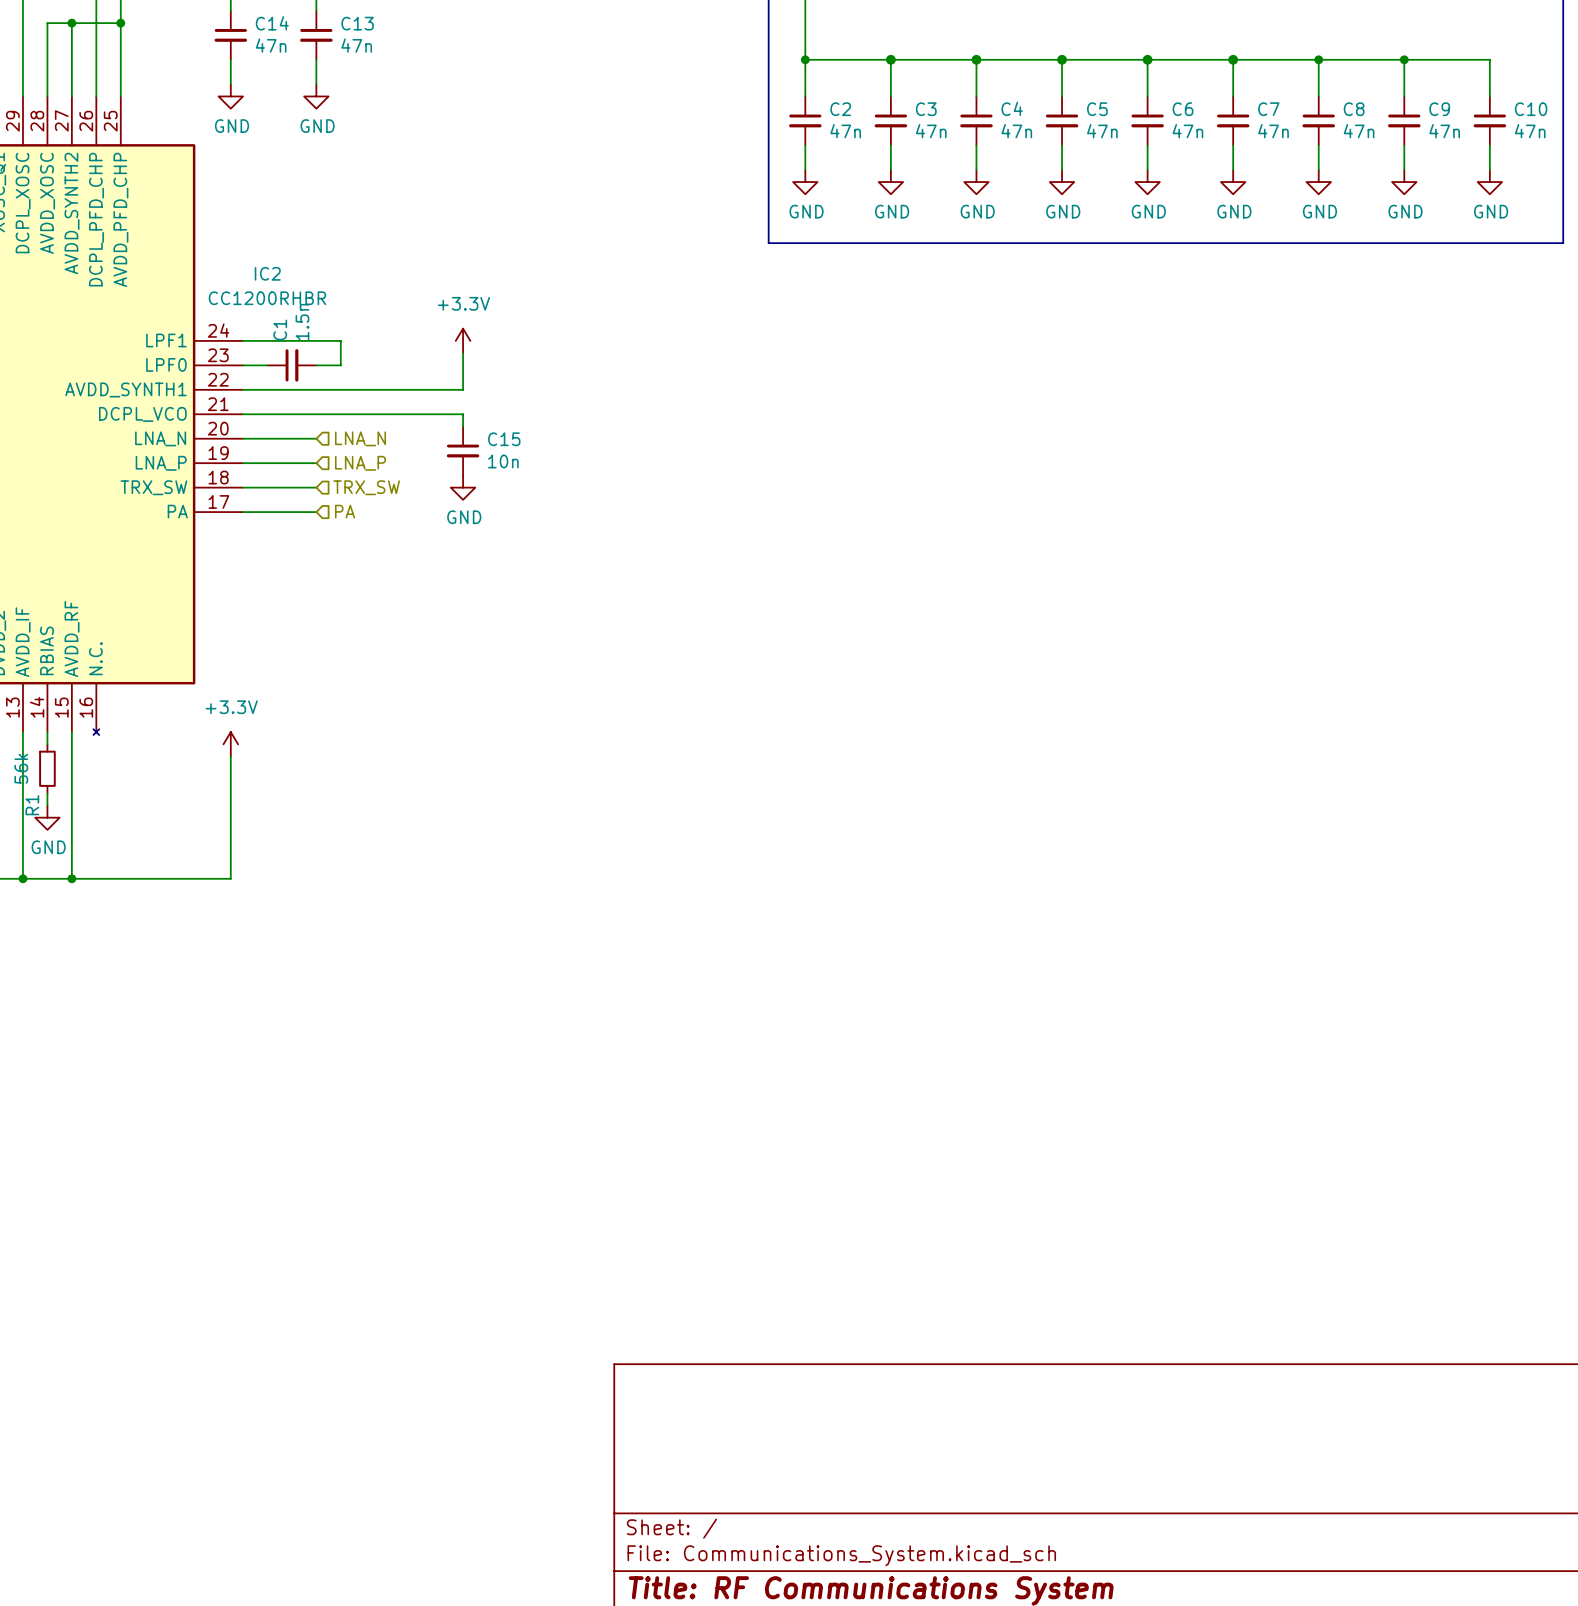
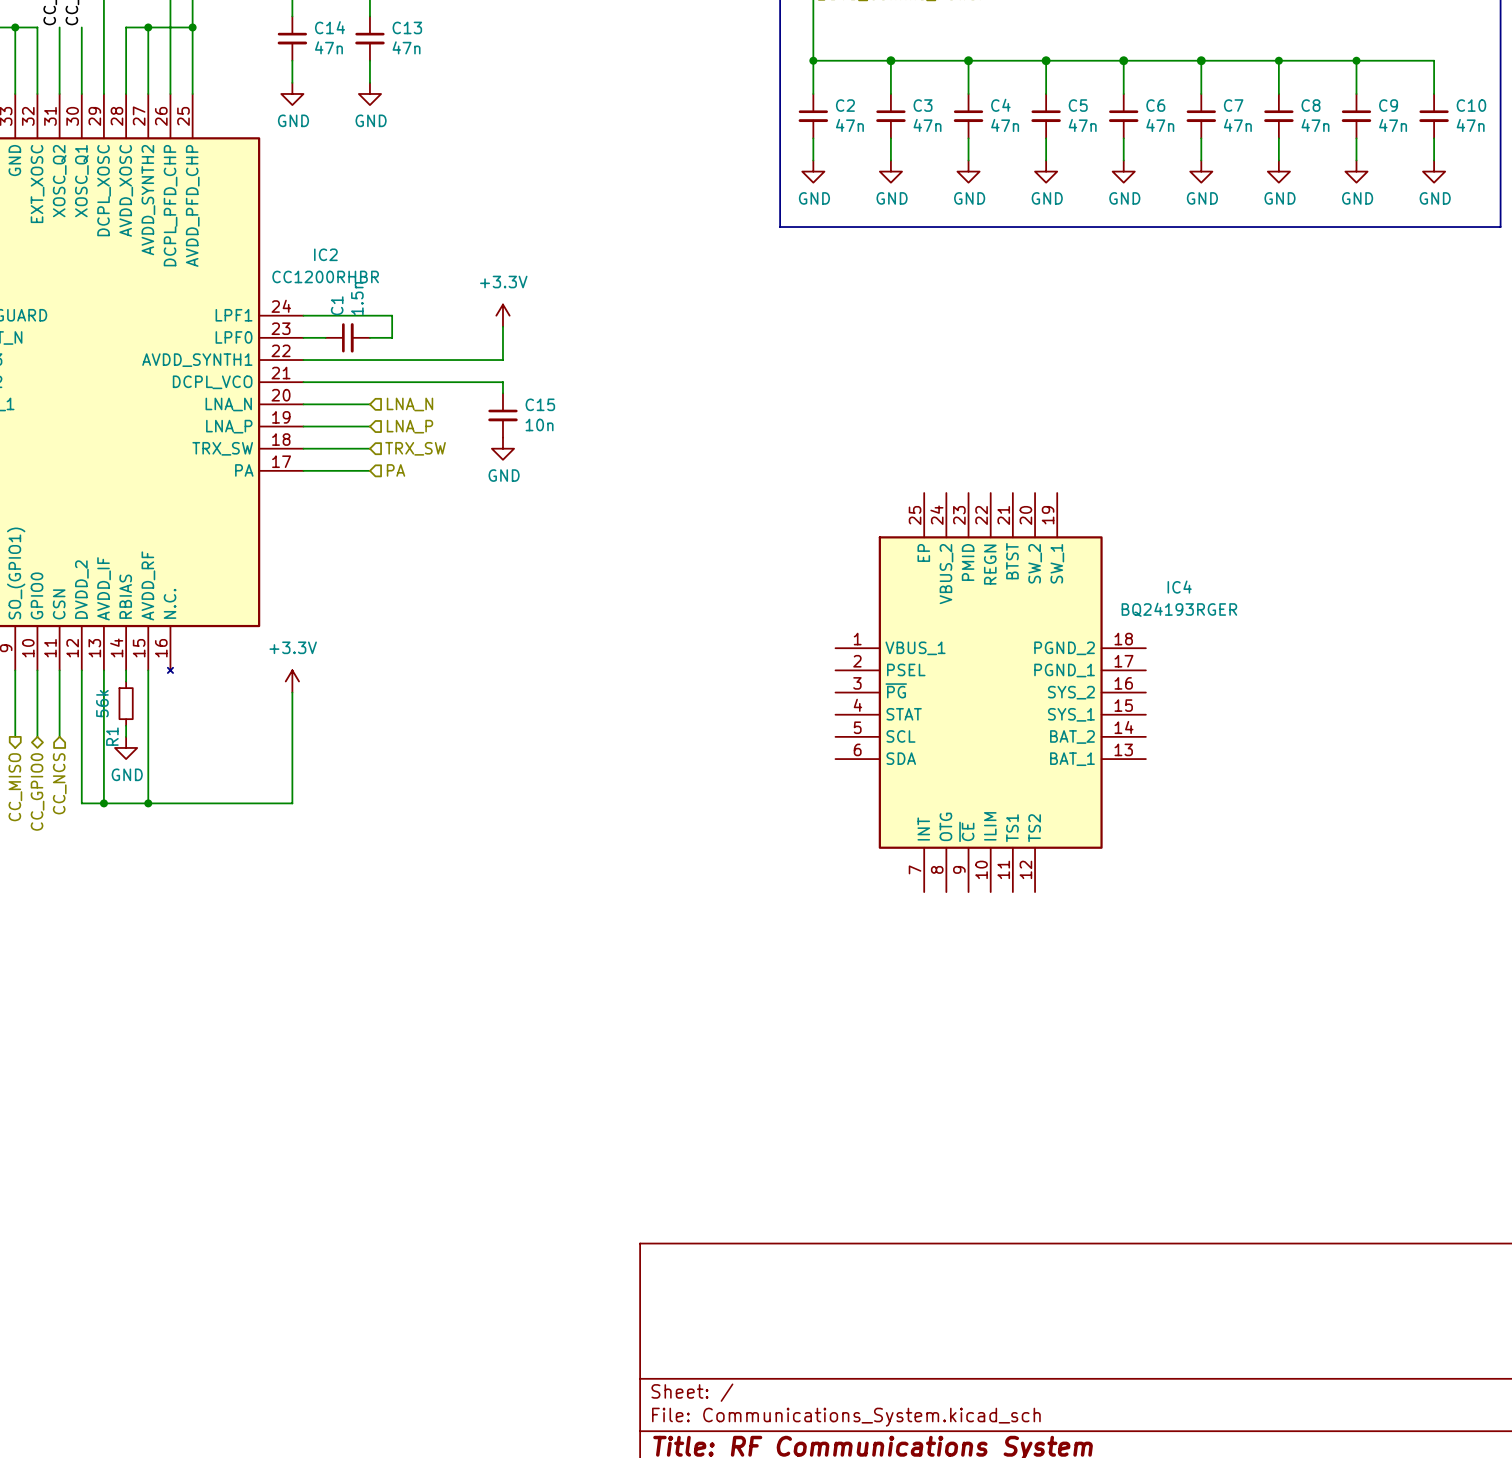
IC4: none -> BQ24193RGER (990, 692)

